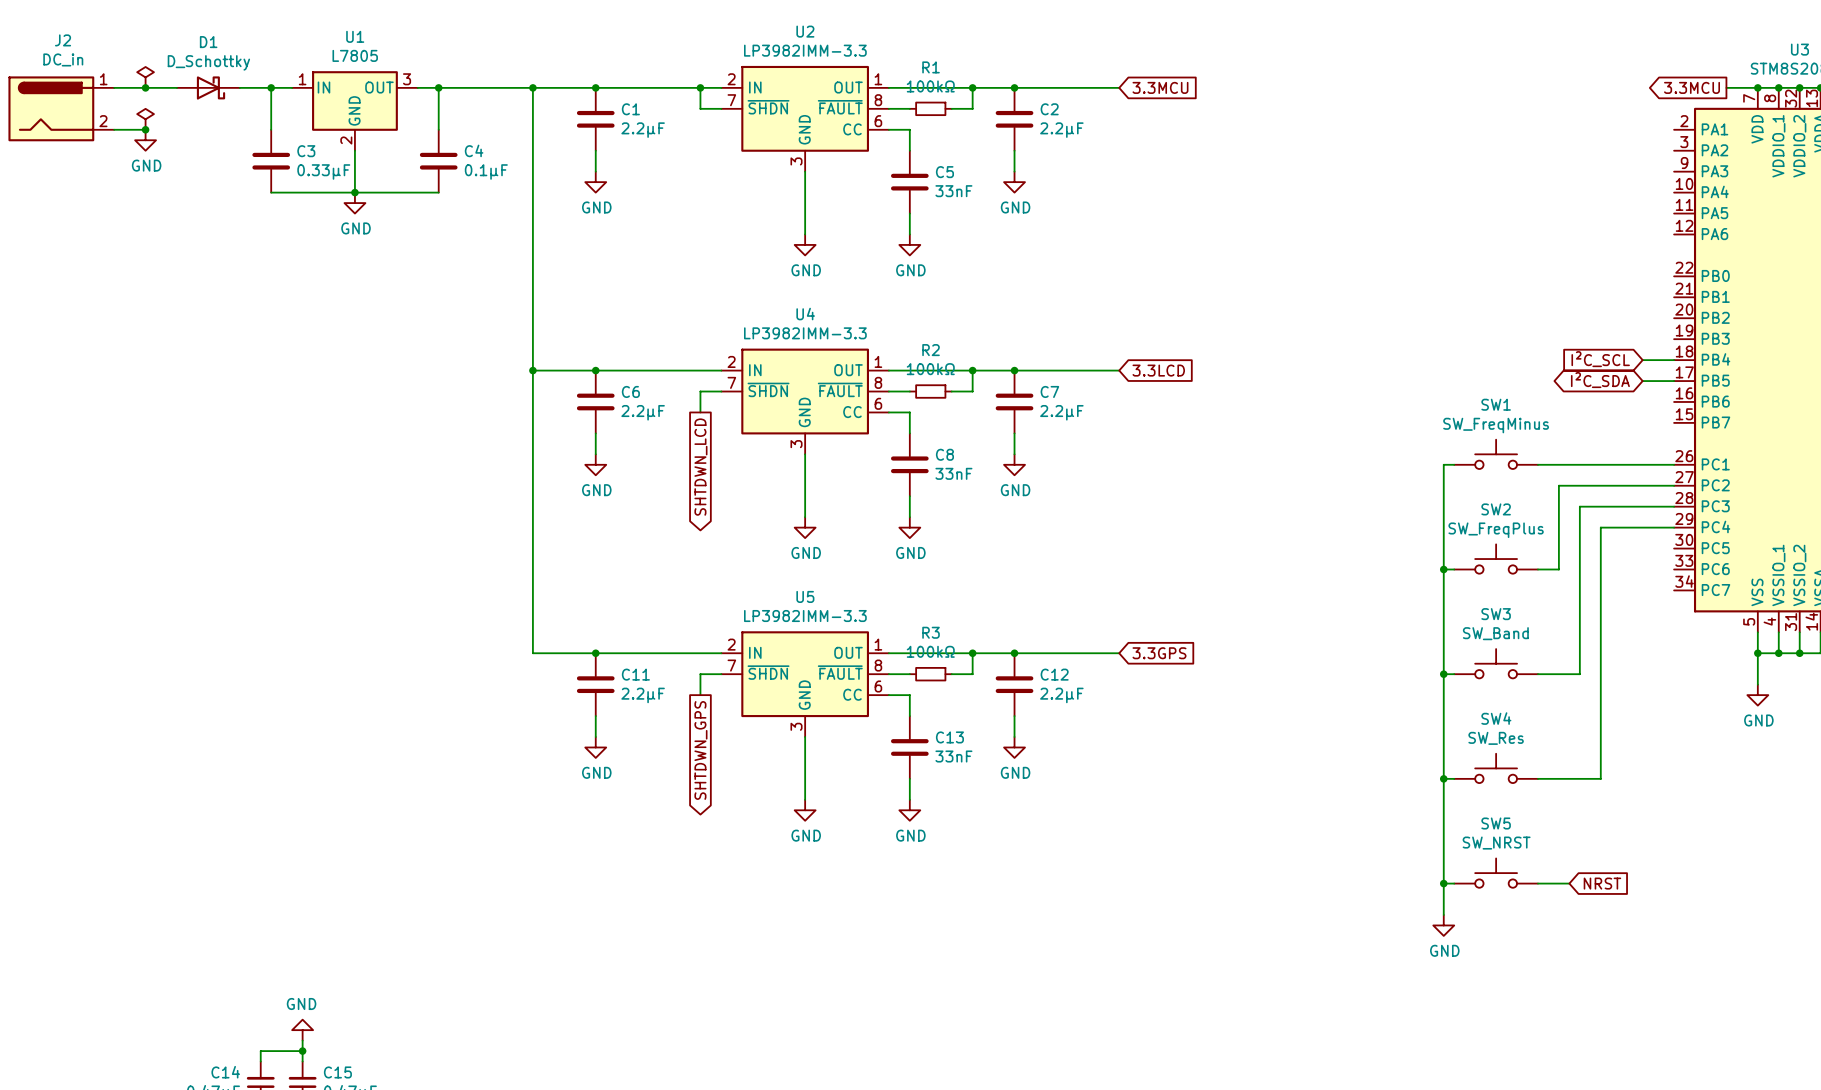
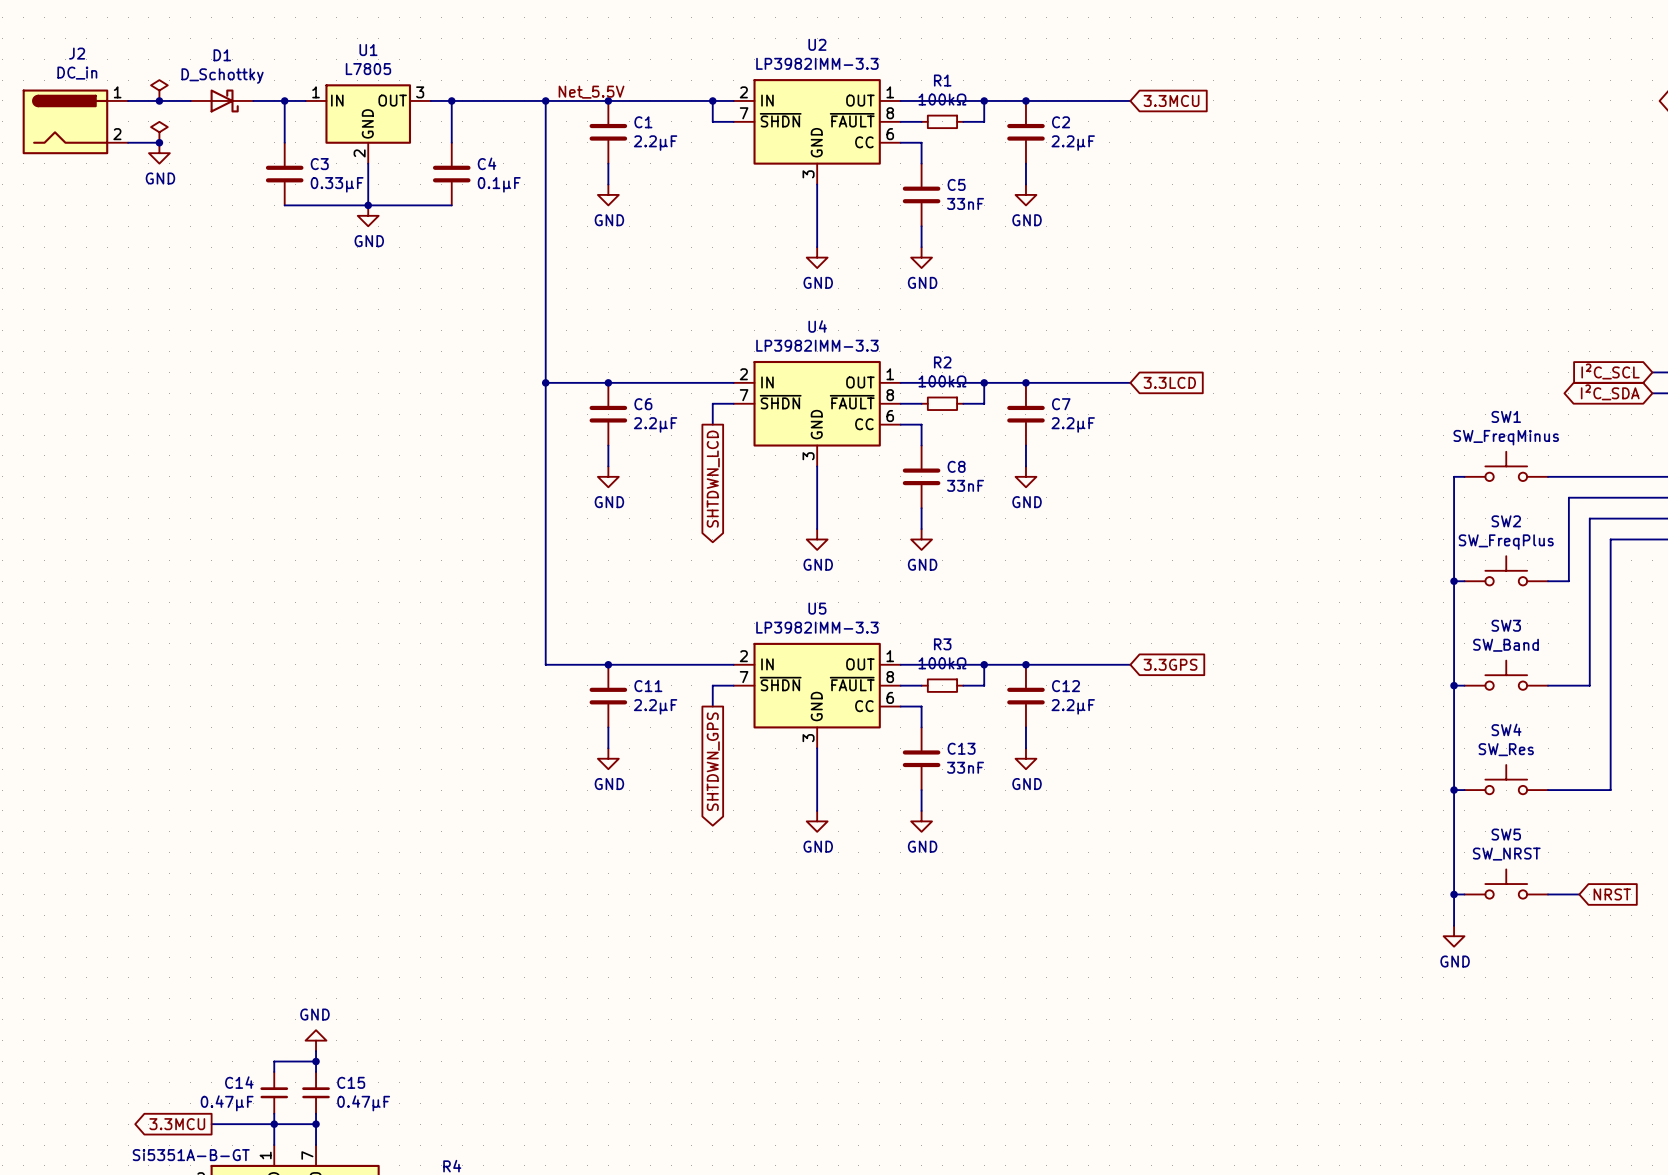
label: none -> Net_5.5V (591, 92)

